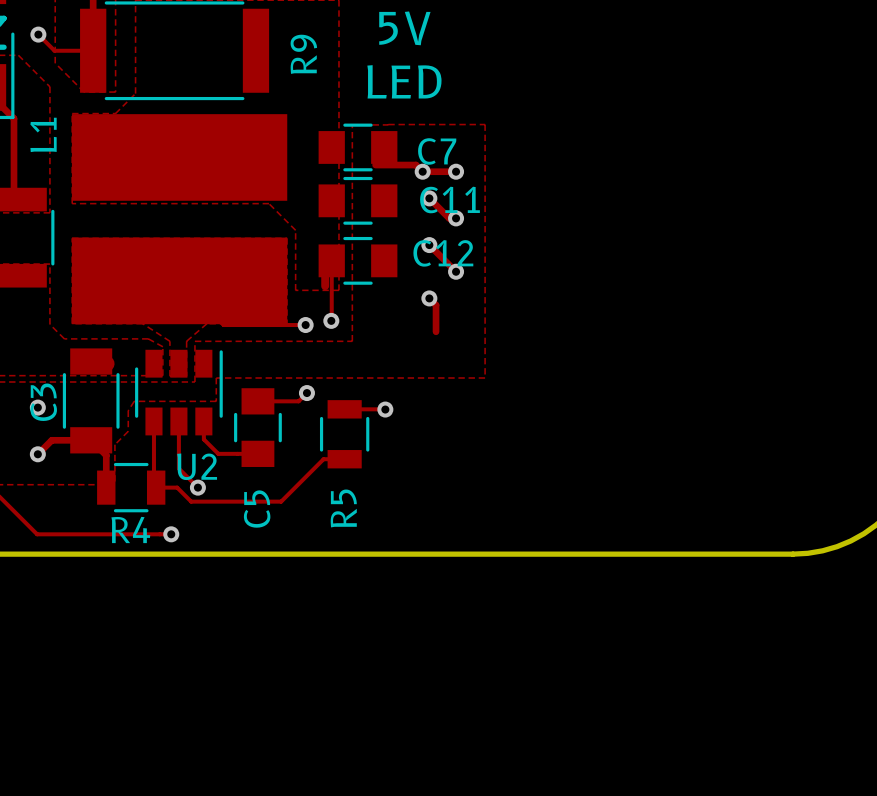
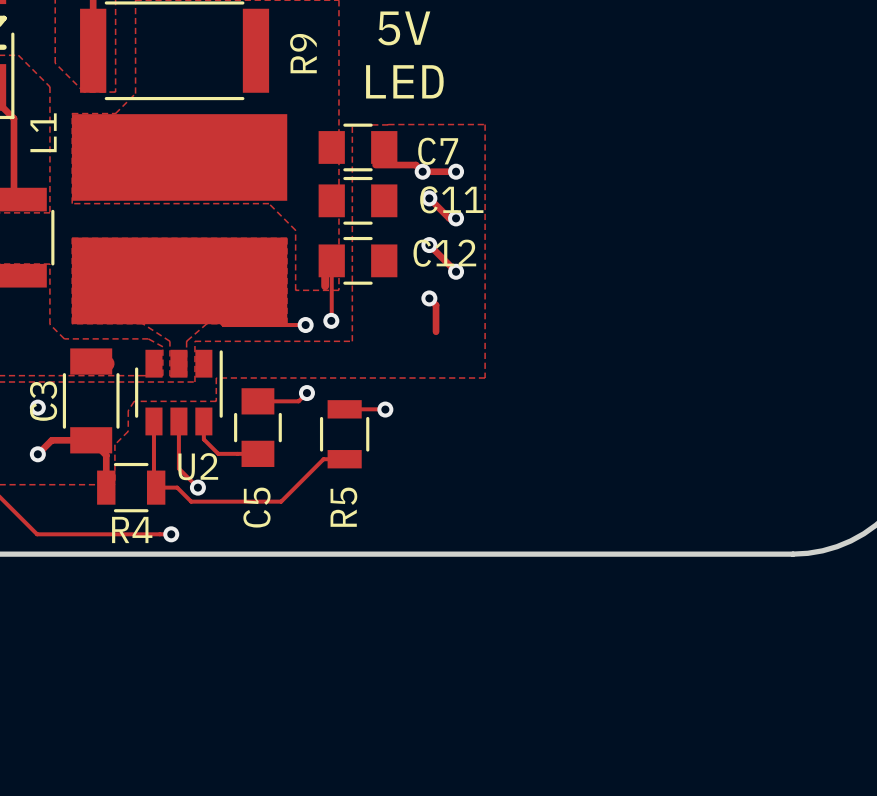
track: (38, 34) (54, 50) (93, 50) -> none
via: (38, 34) -> none

